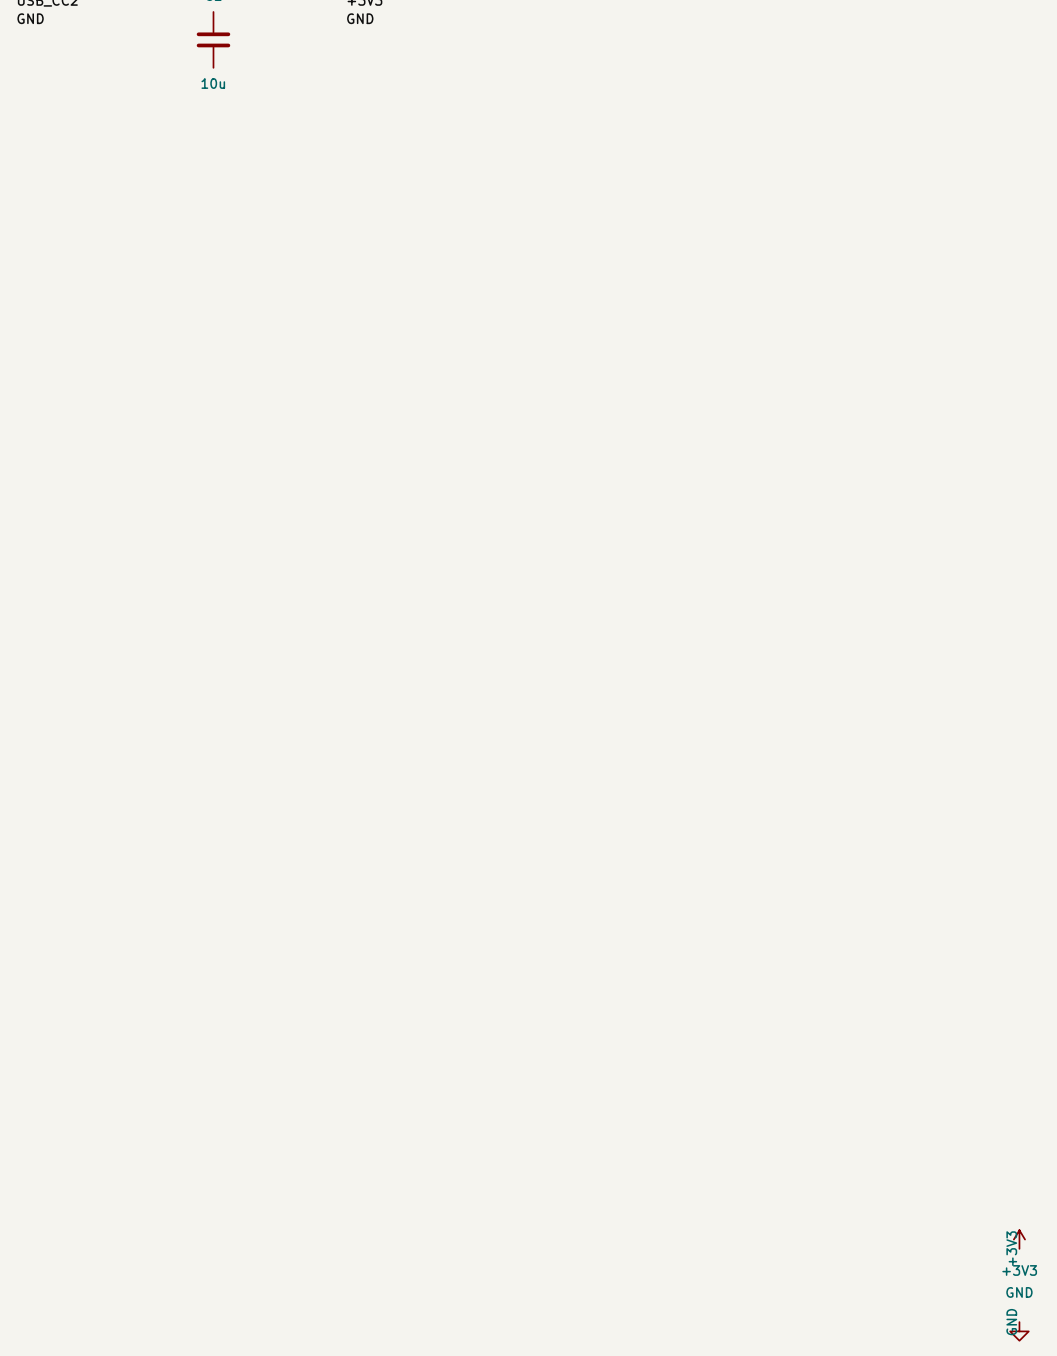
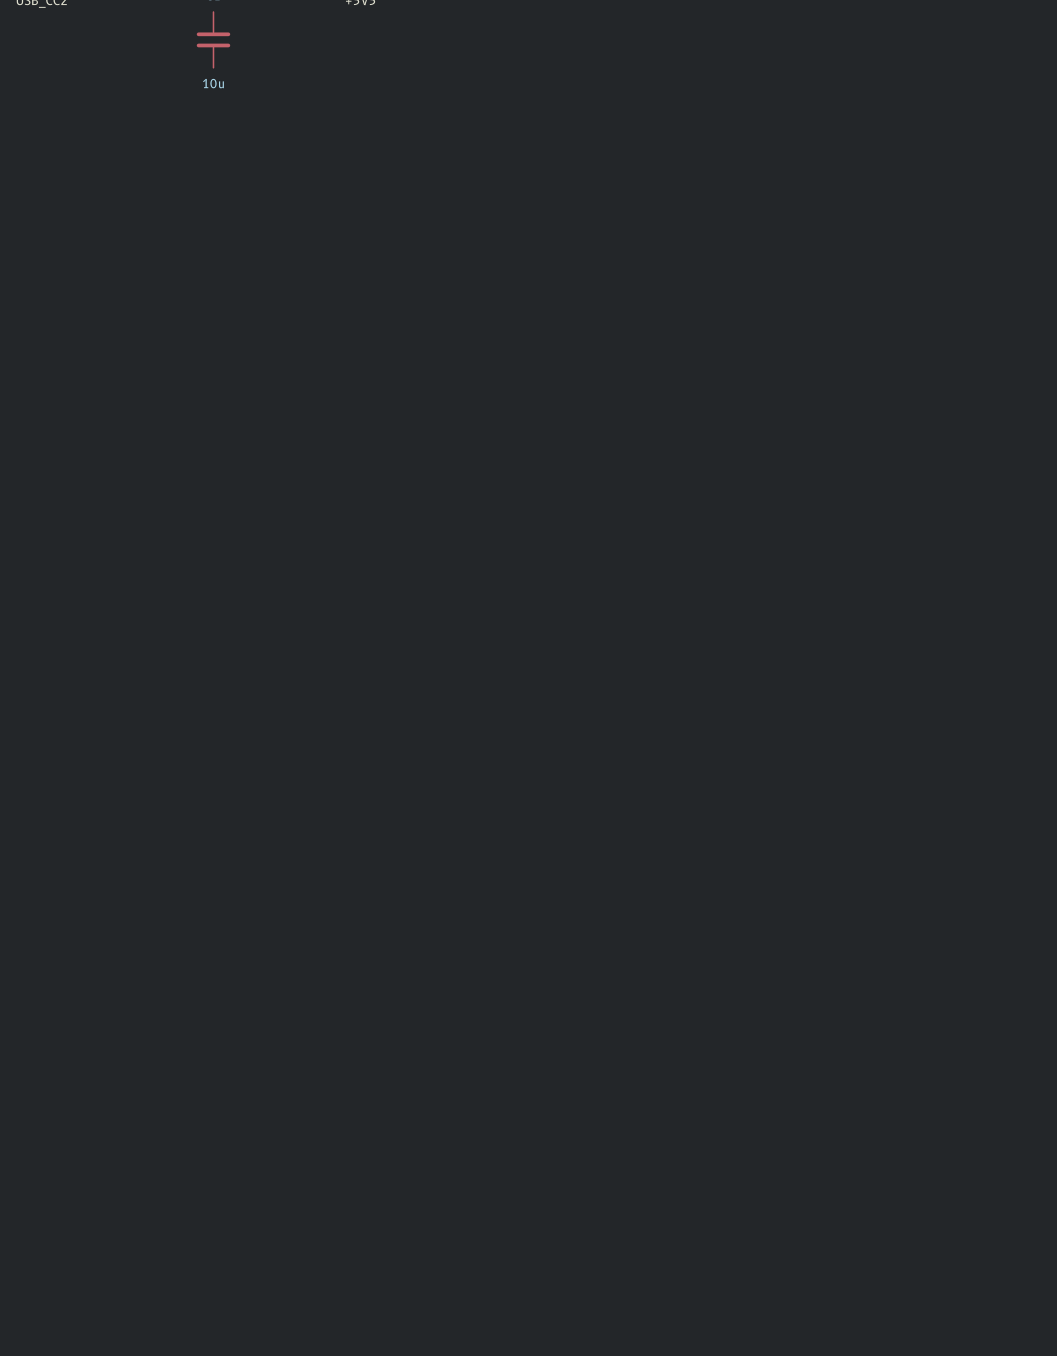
label: GND (30, 18) -> none
label: GND (360, 18) -> none
power symbol: +3V3 (1019, 1239) -> none
power symbol: GND (1019, 1331) -> none

